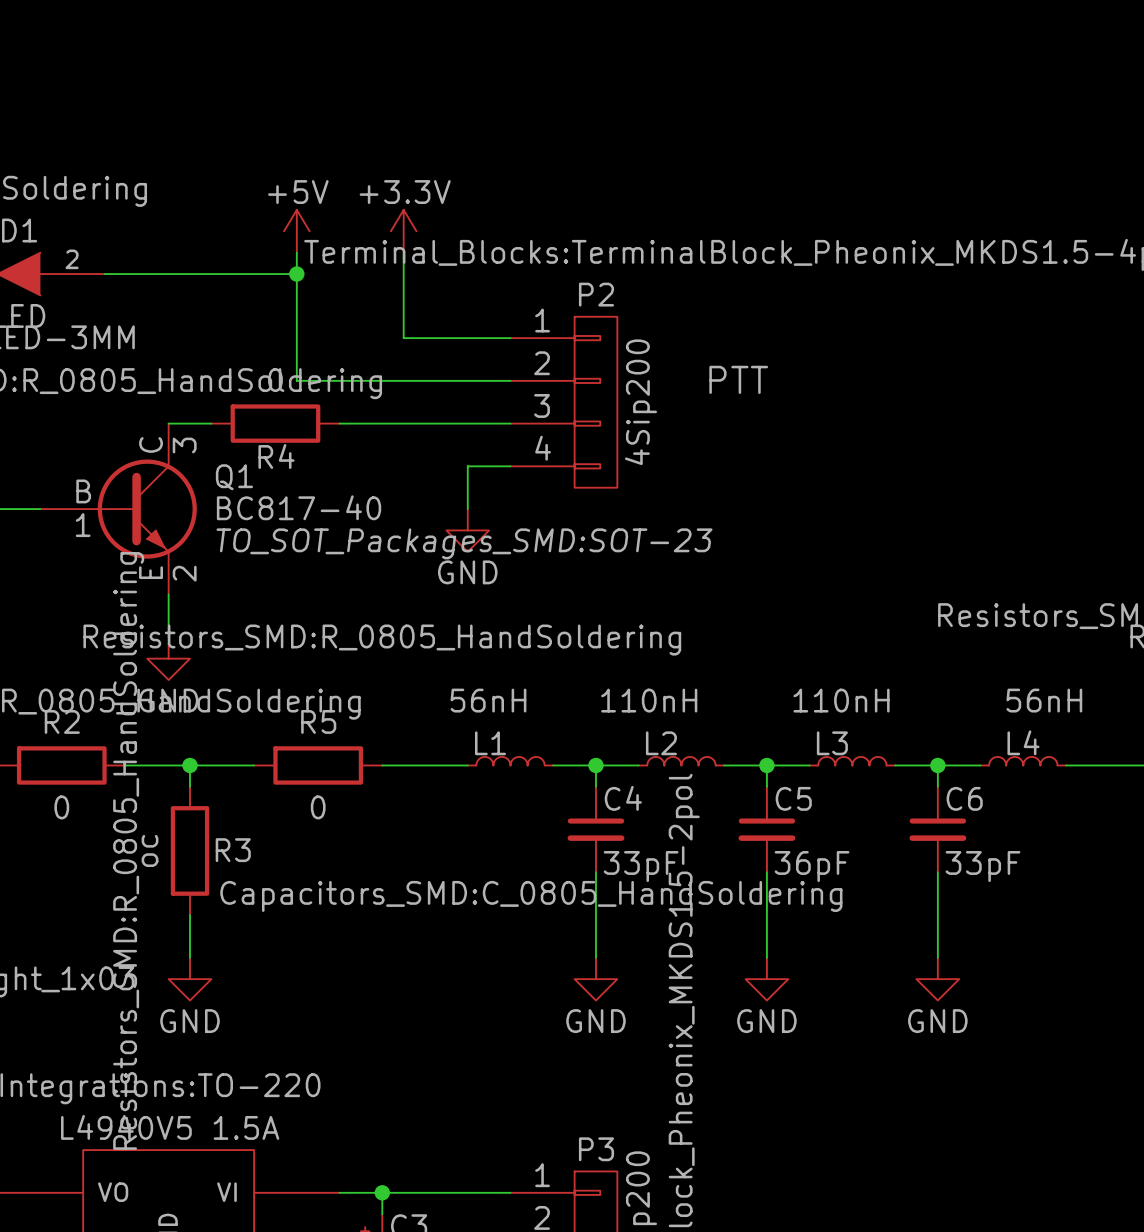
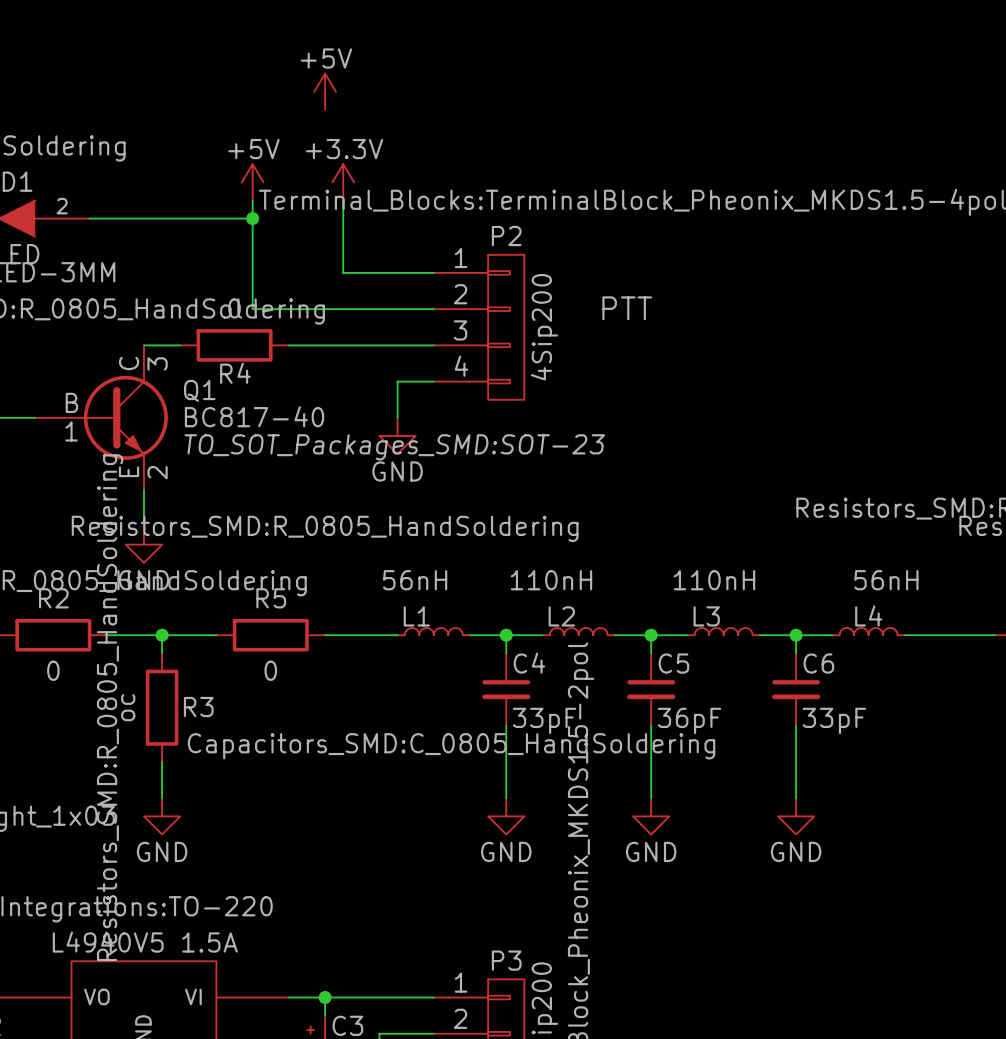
power symbol: none -> +5V (325, 91)

